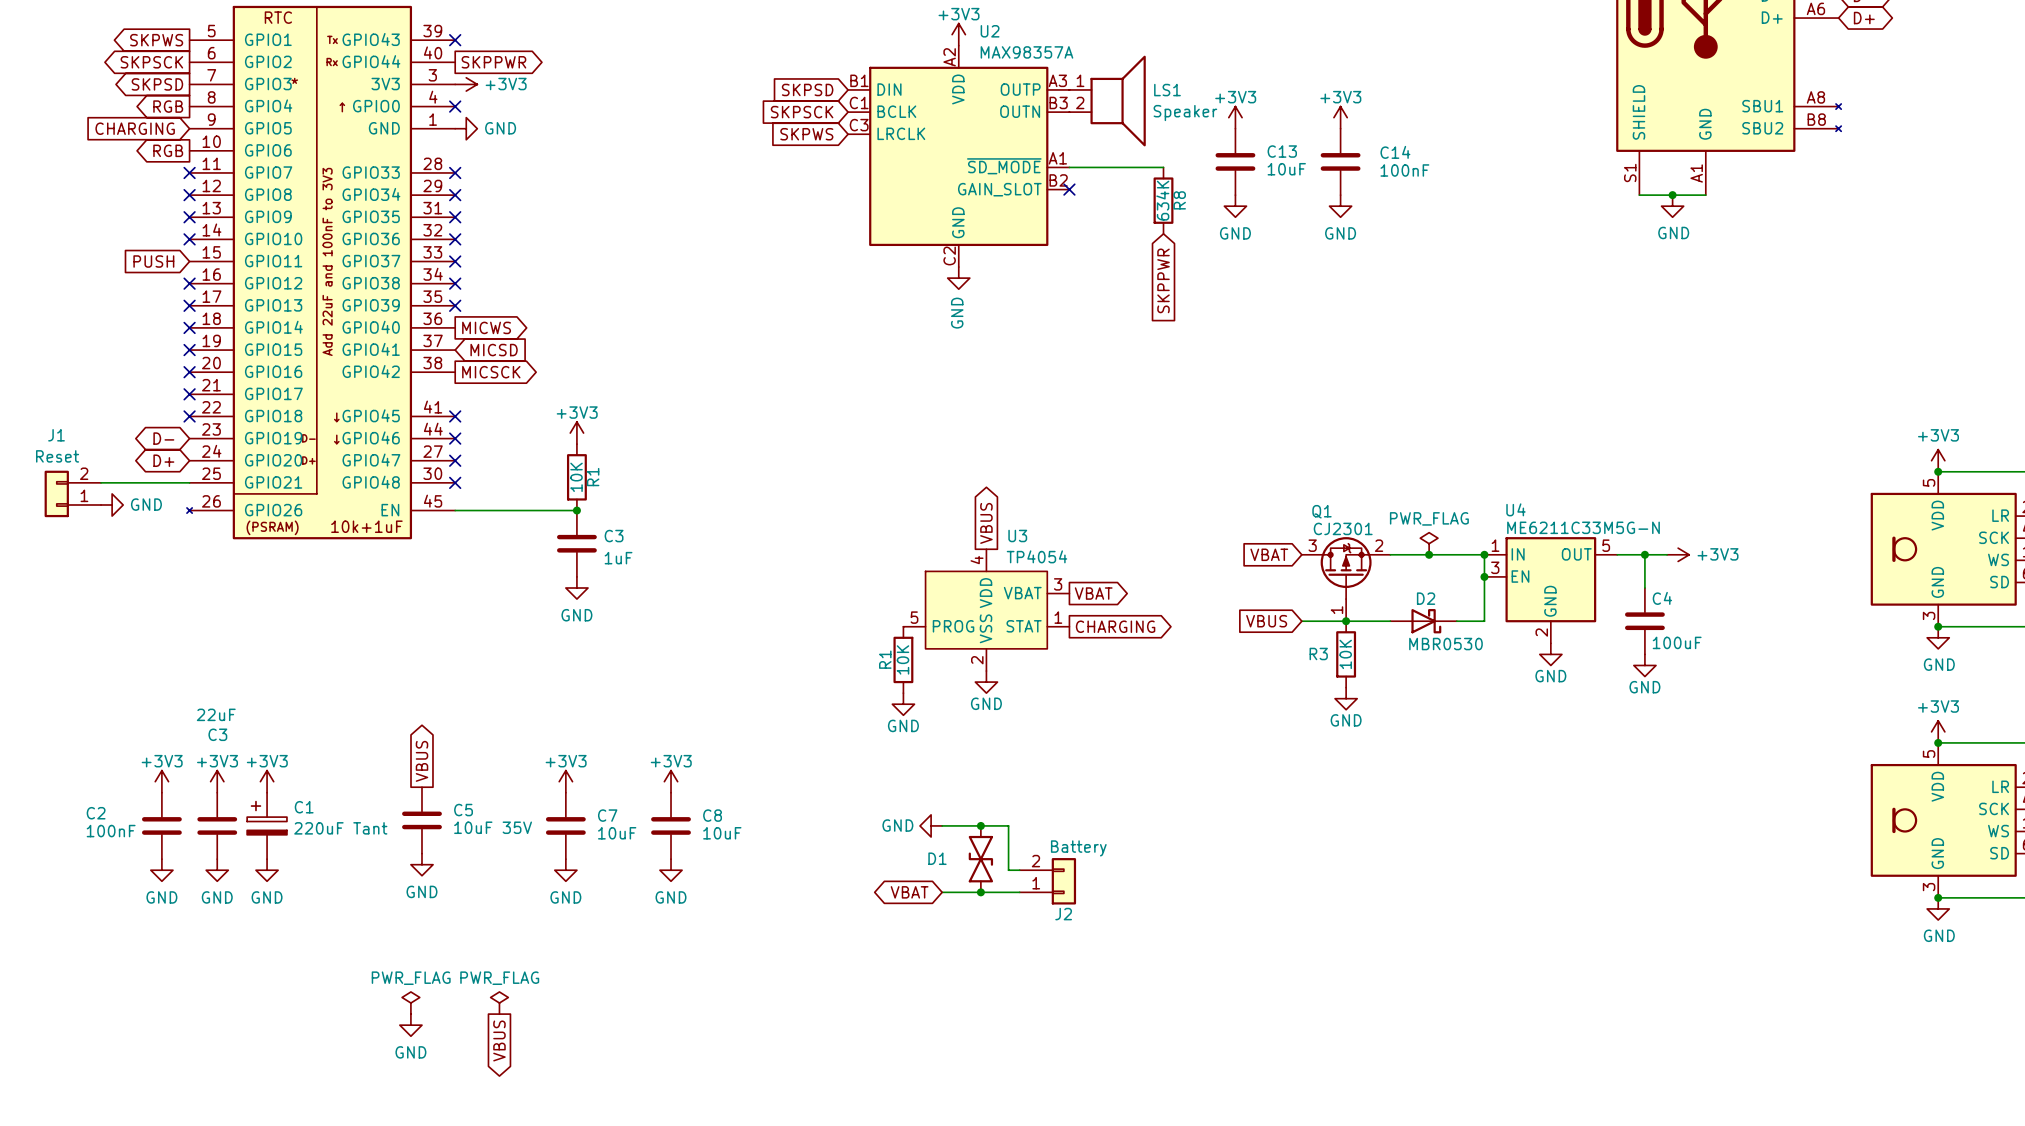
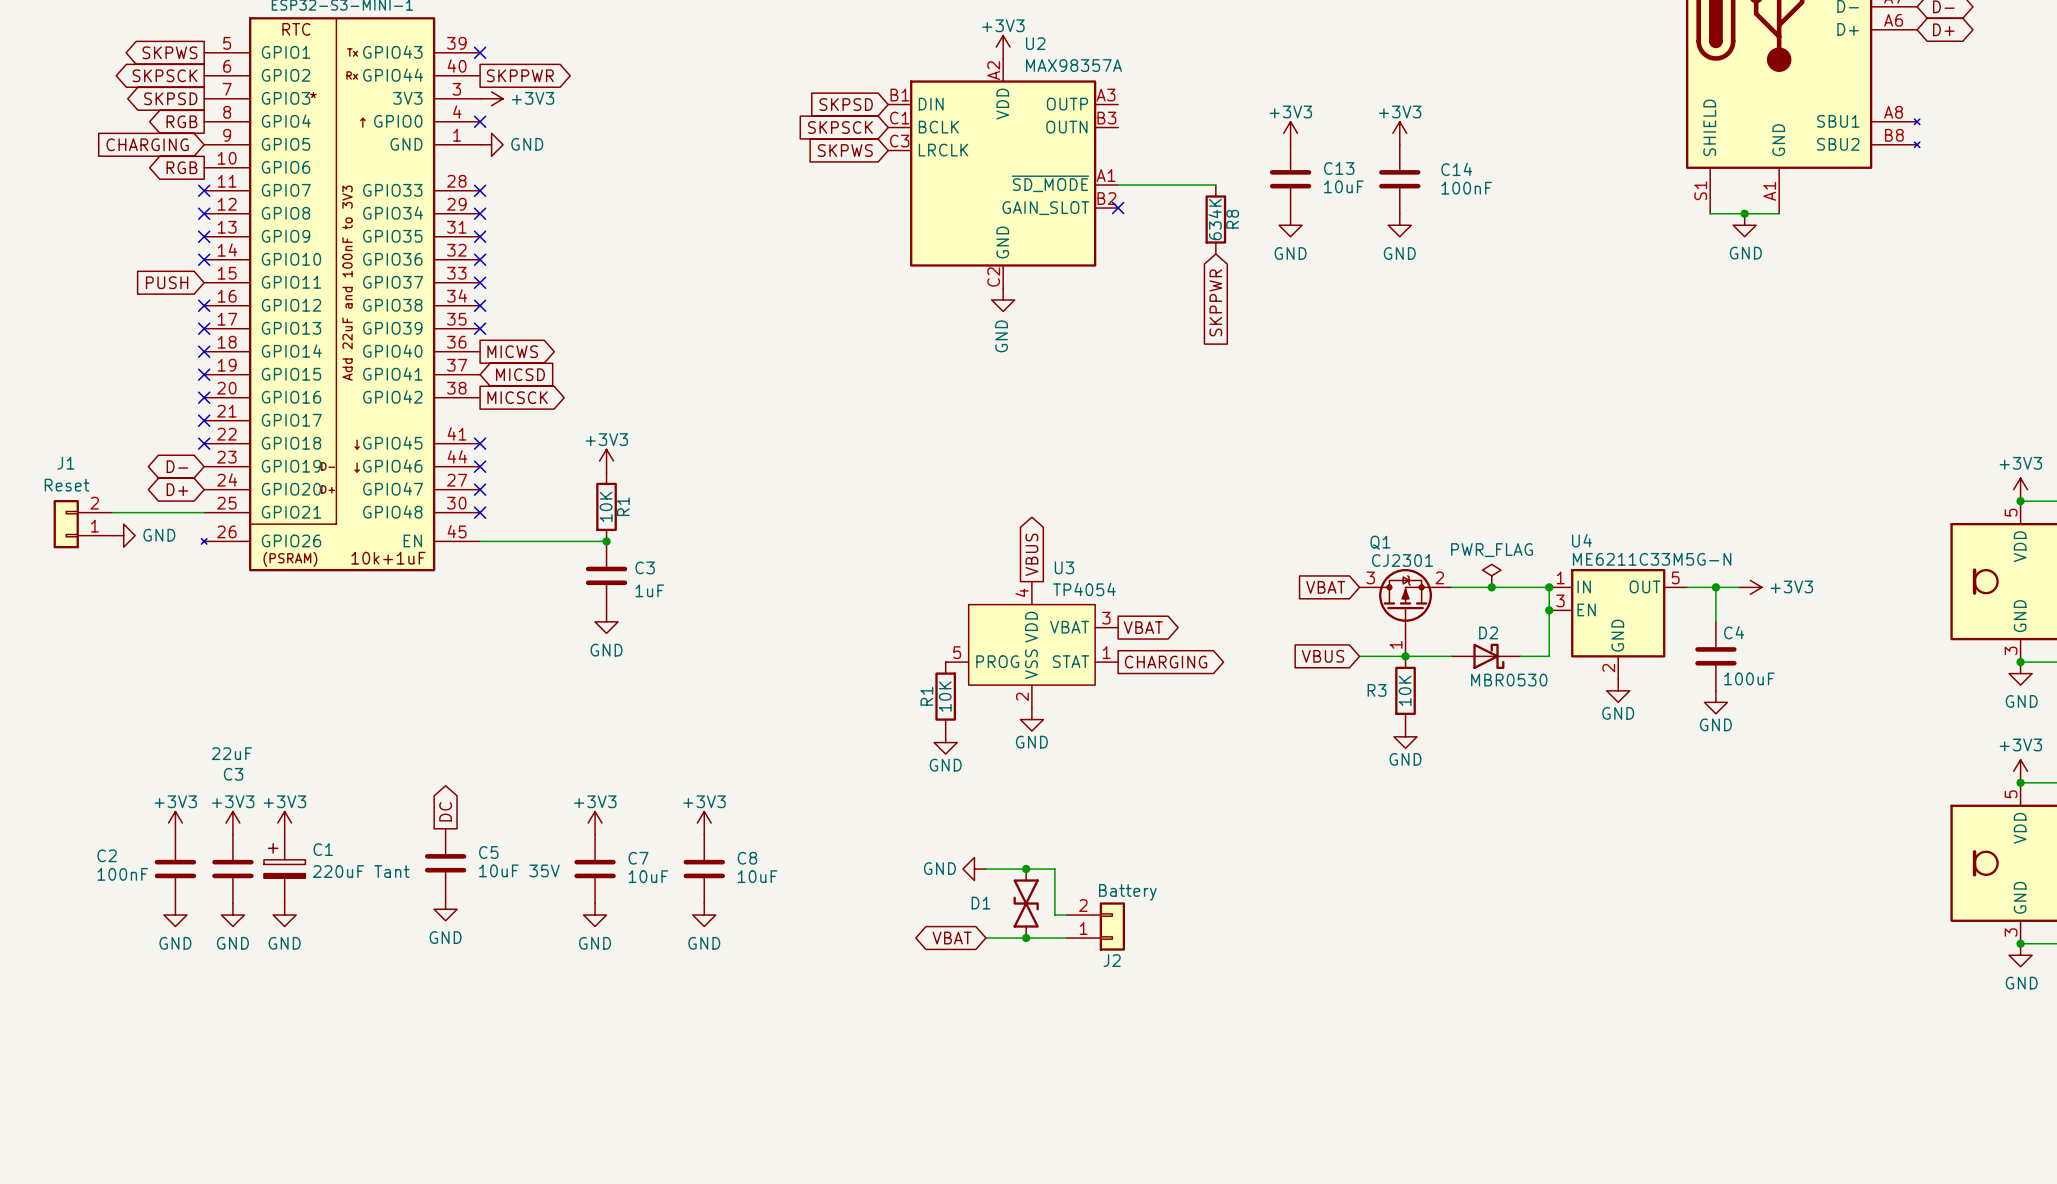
LS1: Speaker (1107, 101) -> none
global label: VBUS (421, 761) -> DC (445, 811)
power symbol: PWR_FLAG (410, 1003) -> none
power symbol: PWR_FLAG (499, 1003) -> none
power symbol: GND (410, 1025) -> none
global label: VBUS (499, 1040) -> none

